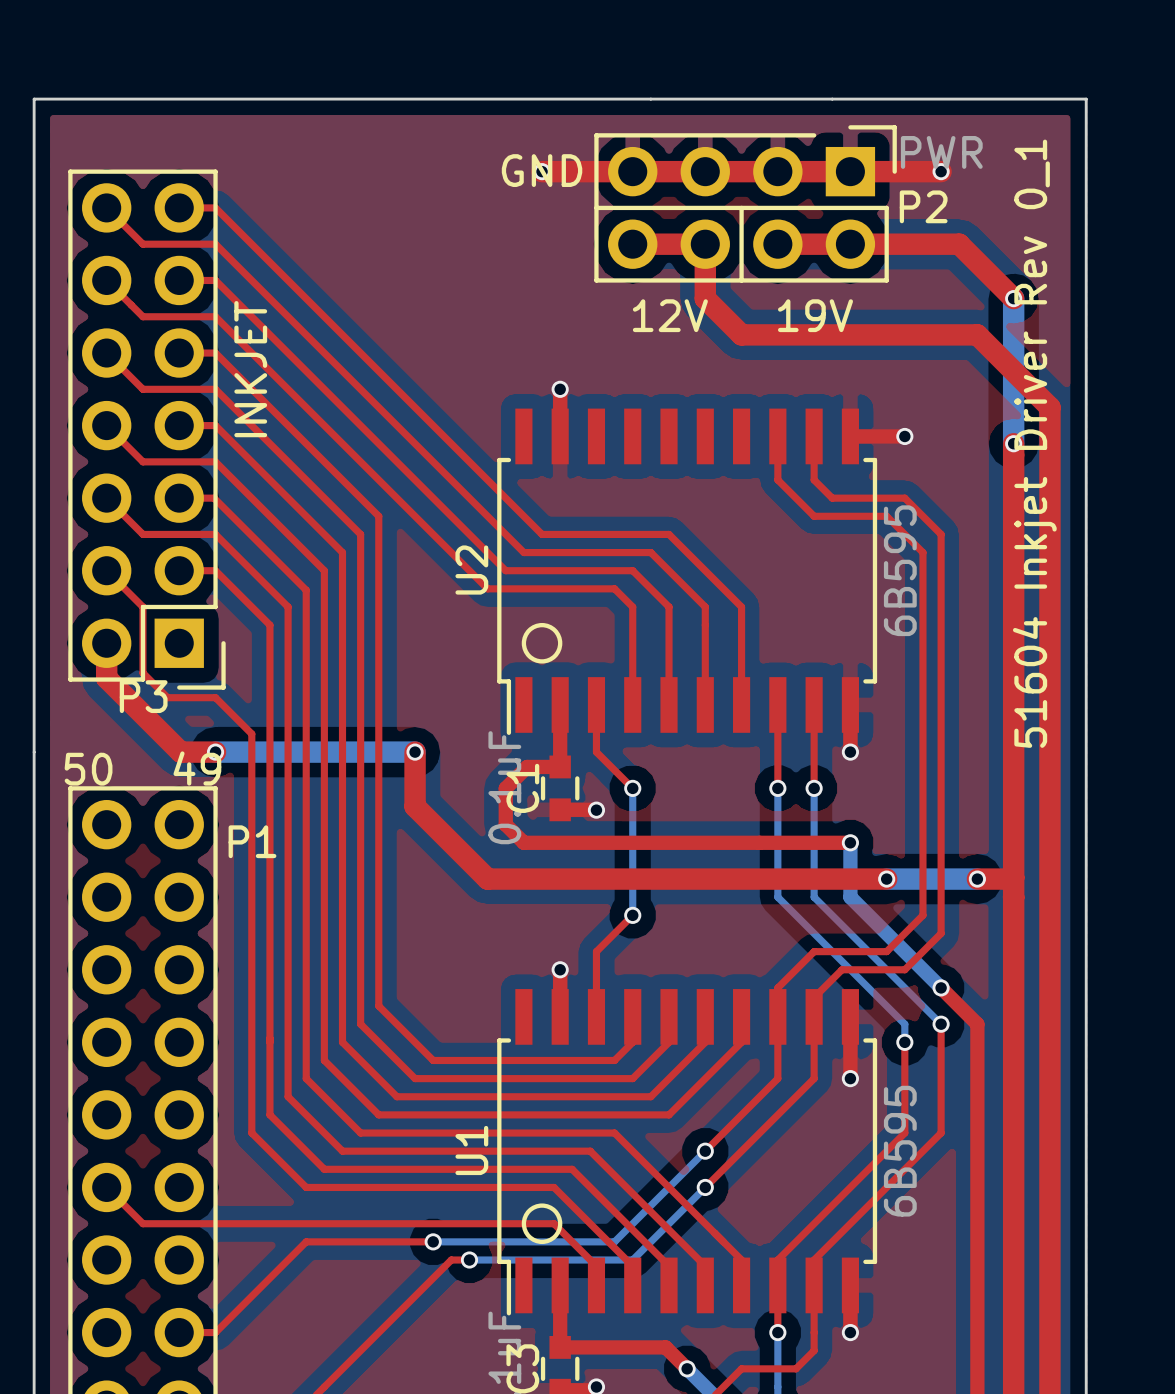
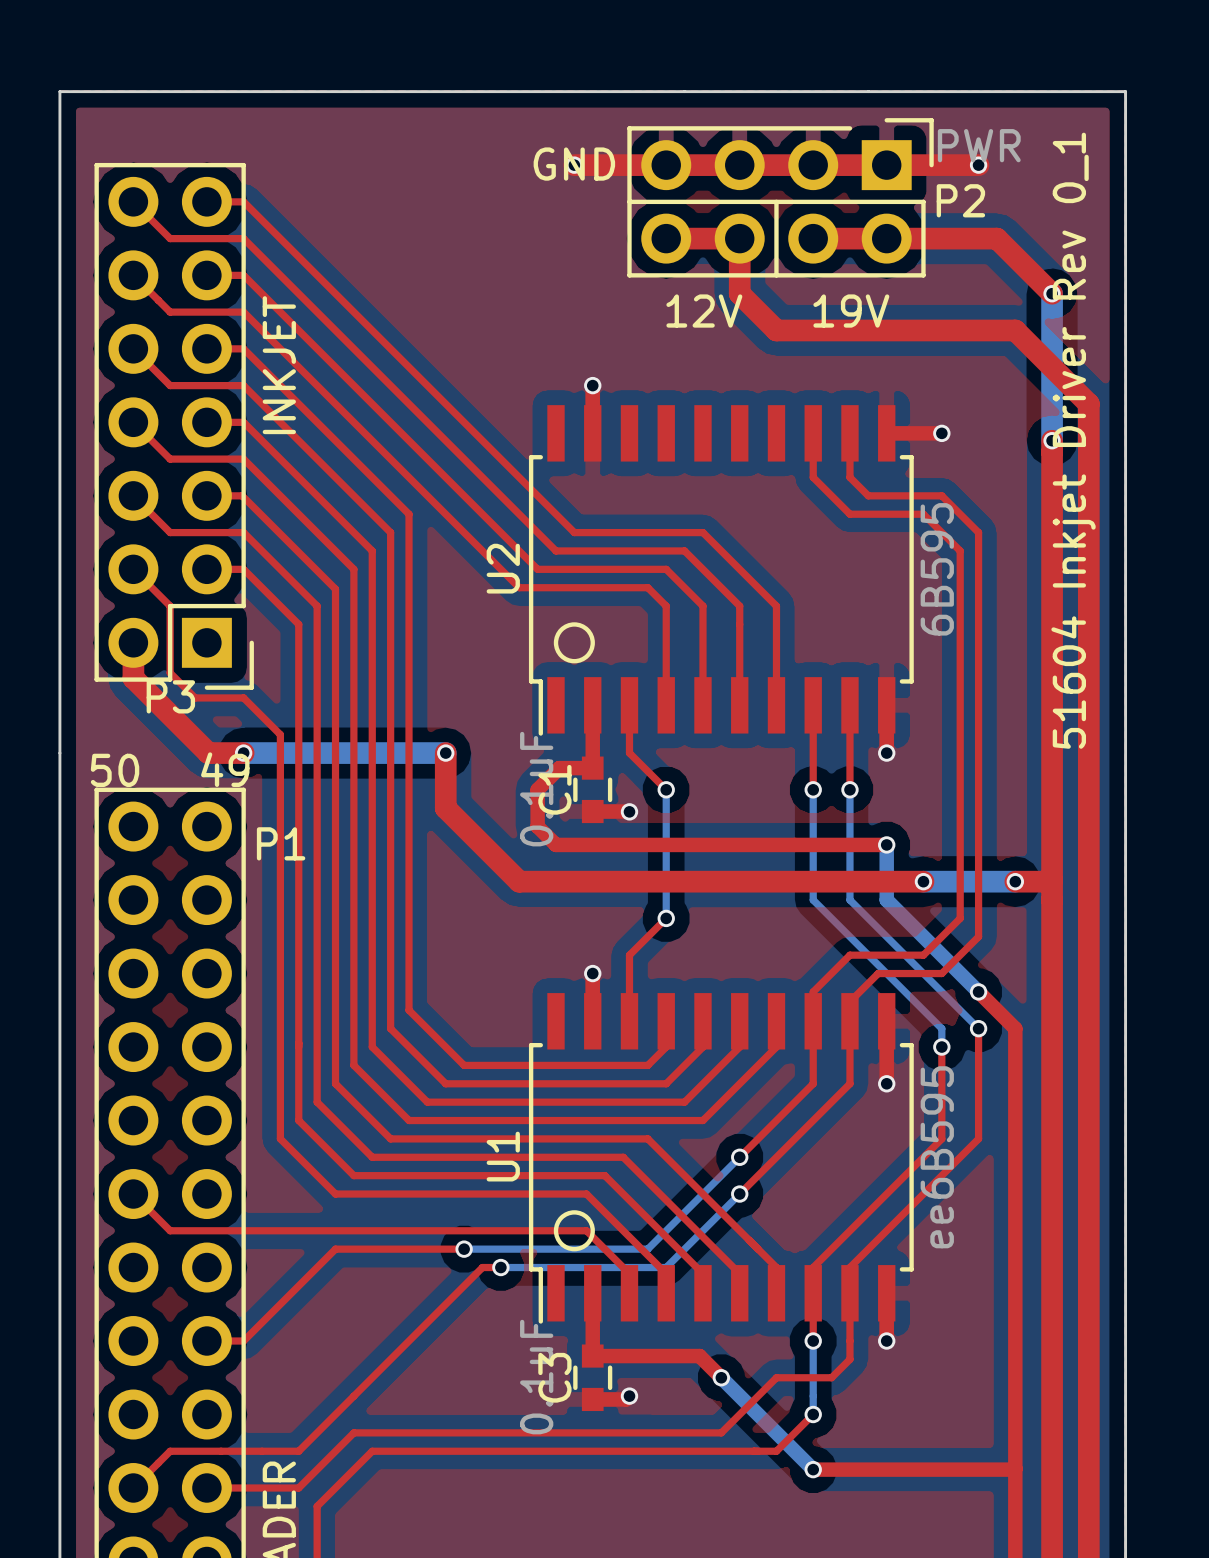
U1 value: 6B595 (900, 1151) -> ee6B595 (937, 1157)

